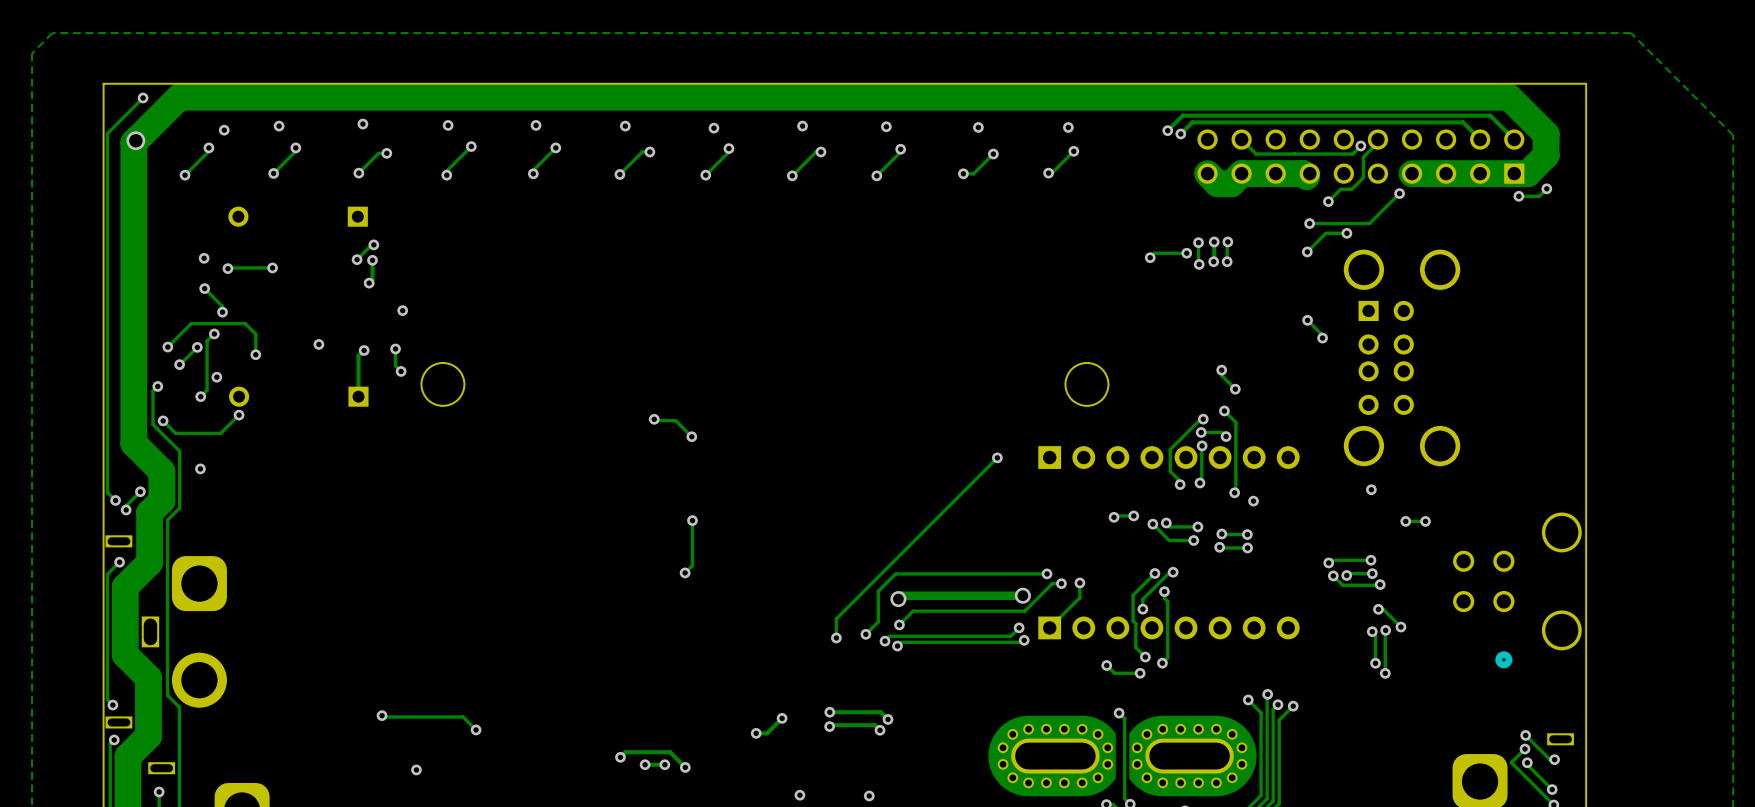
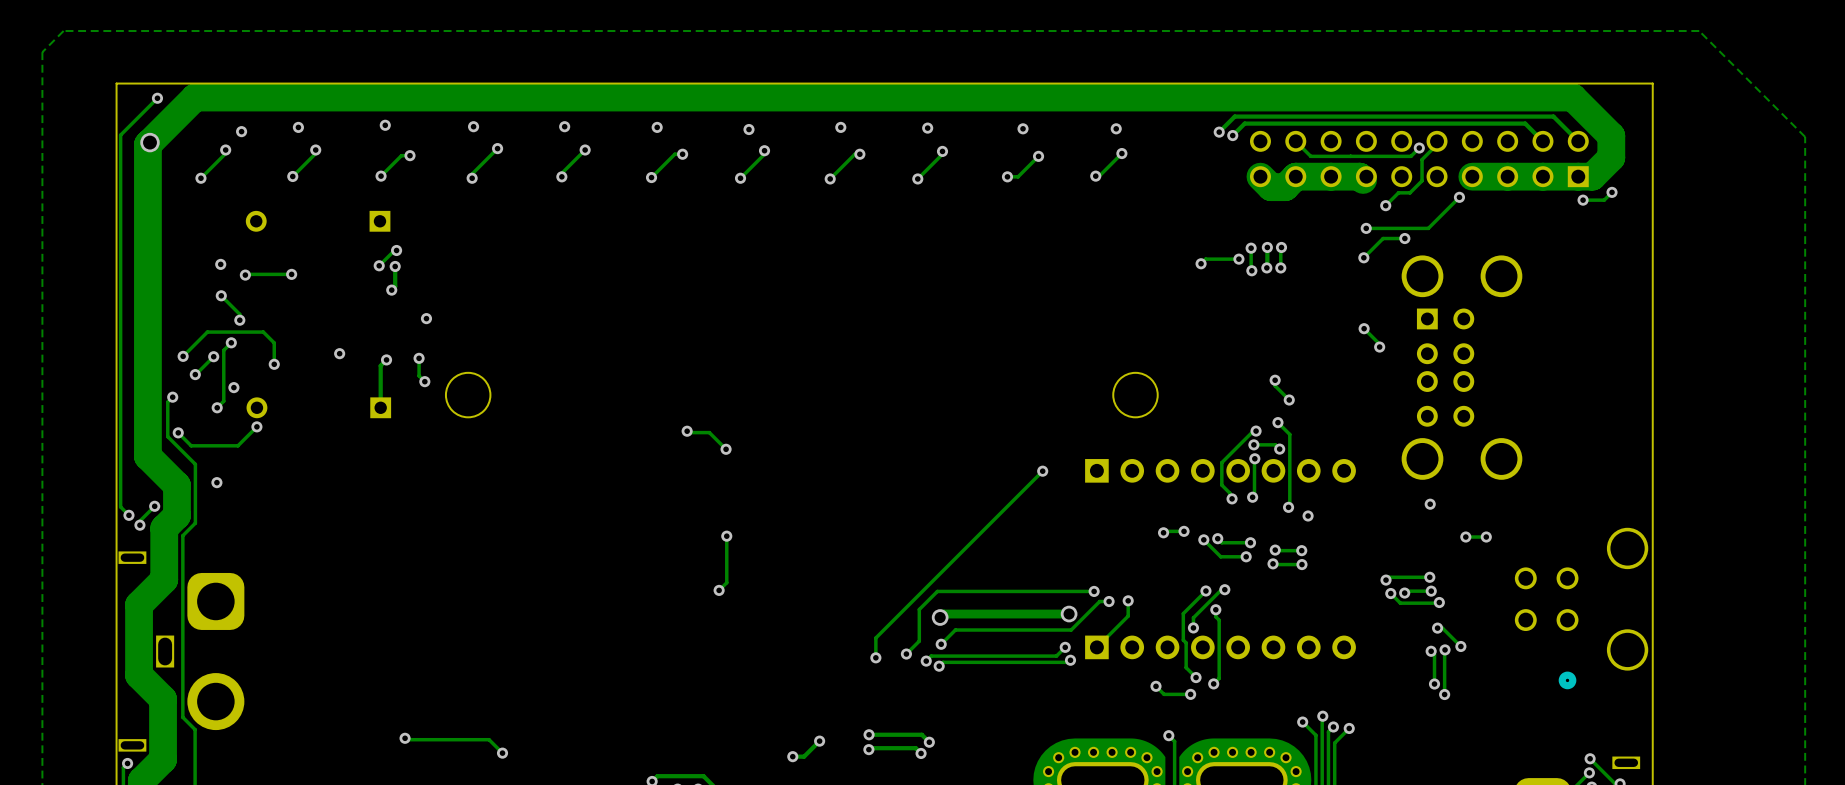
track: (119, 562) (107, 574) (107, 699) (112, 705) -> none
via: (119, 562) -> none
via: (112, 705) -> none

